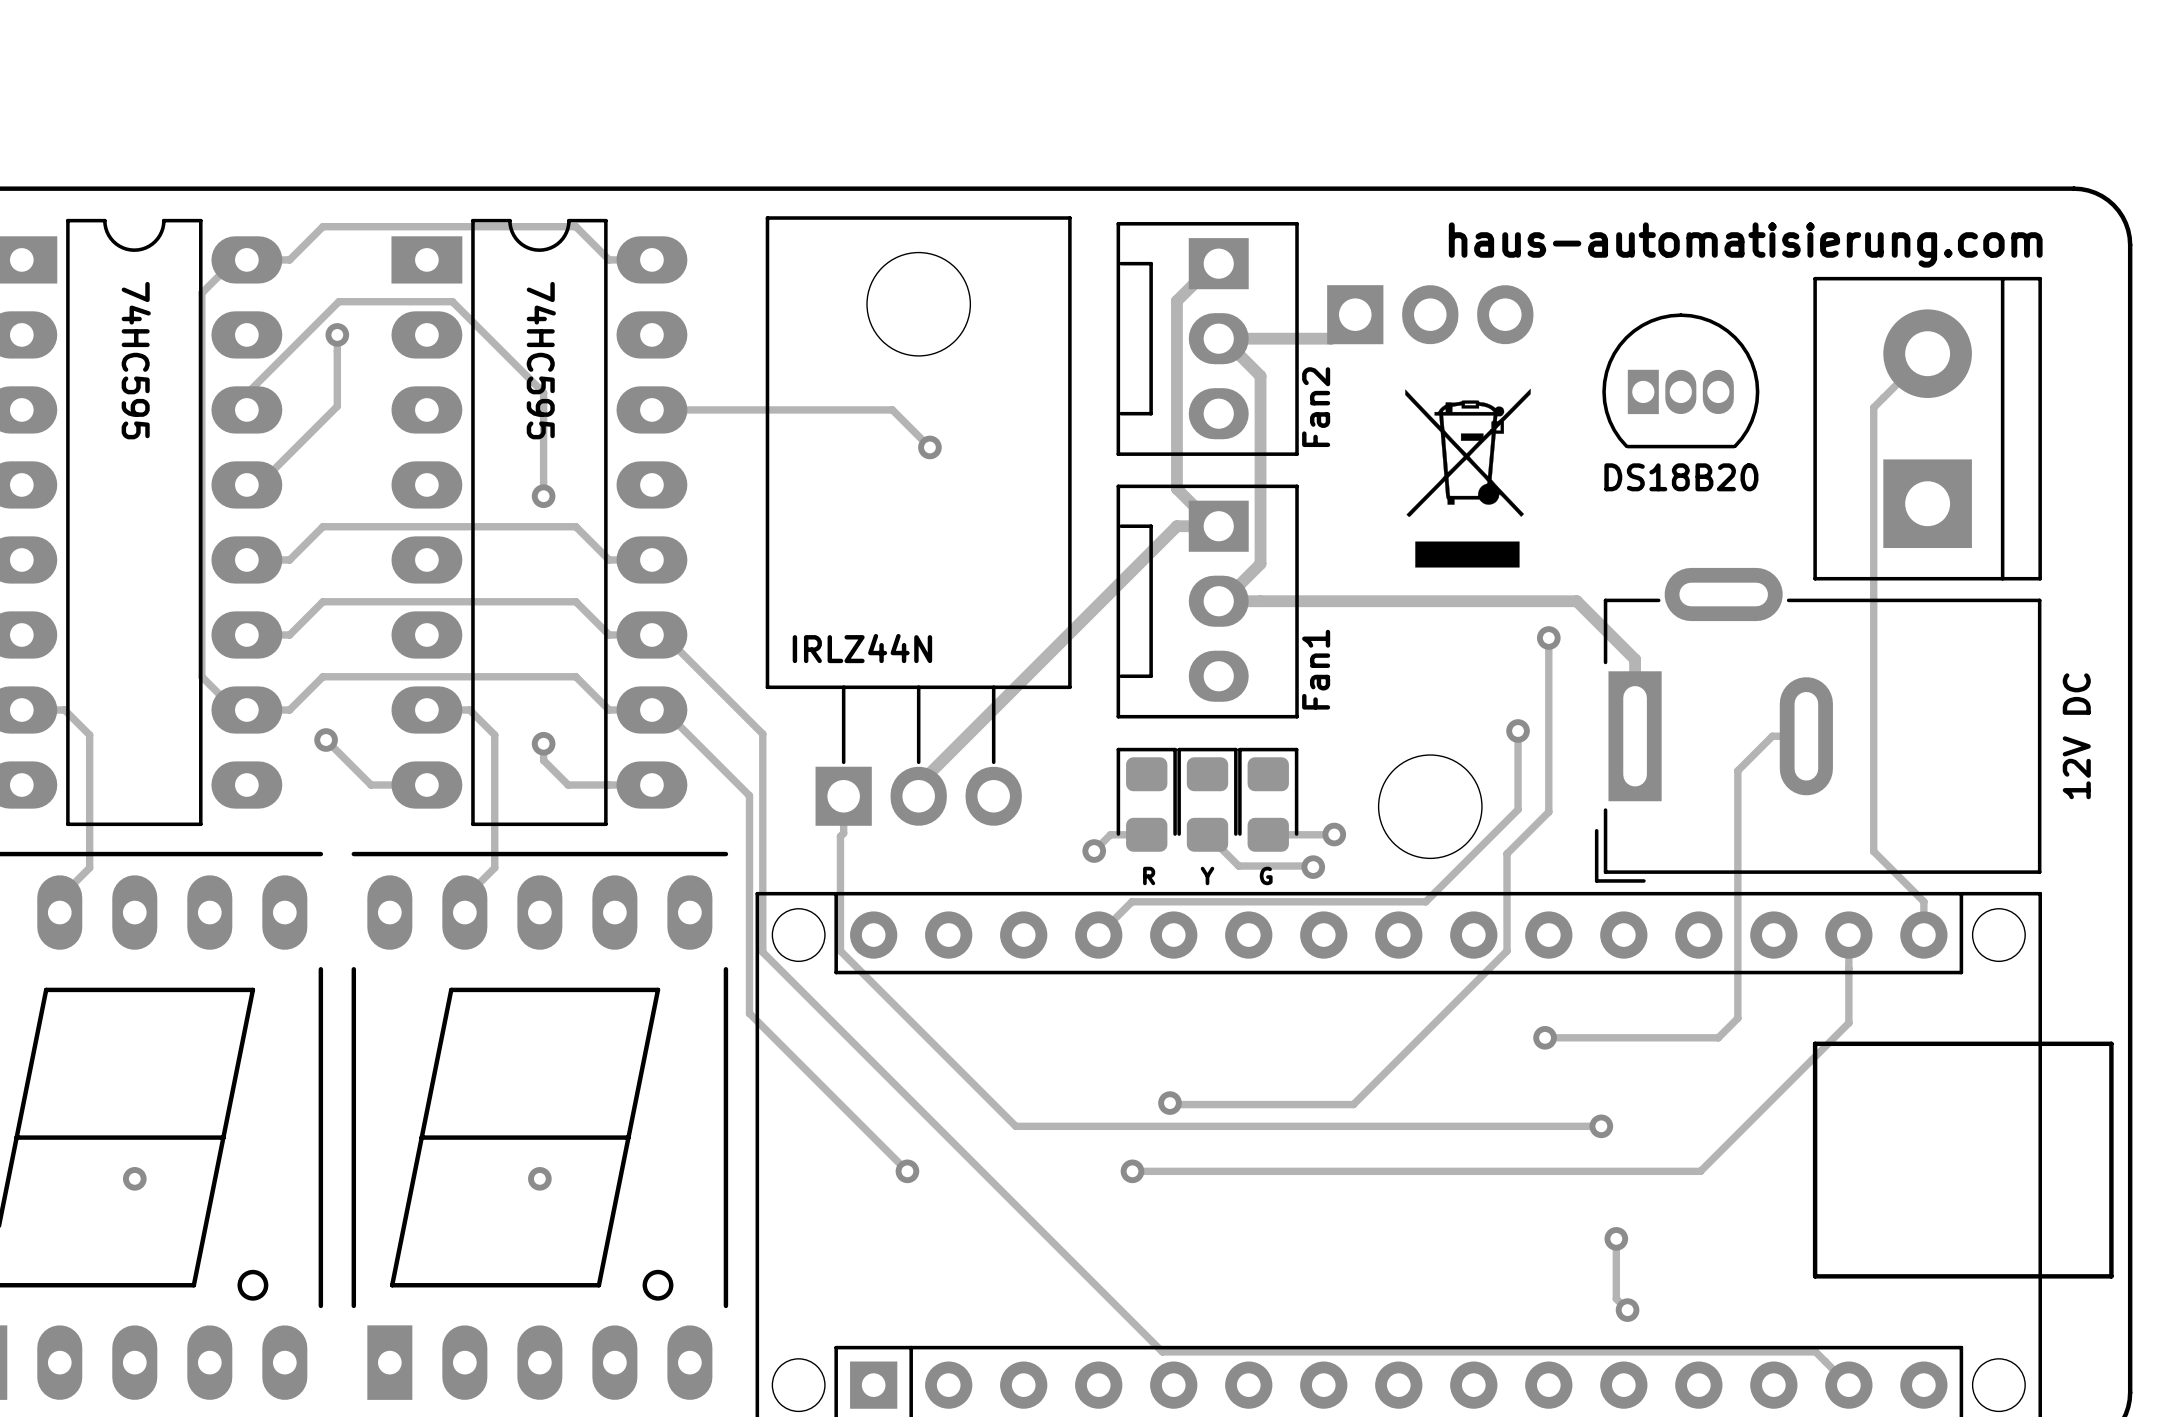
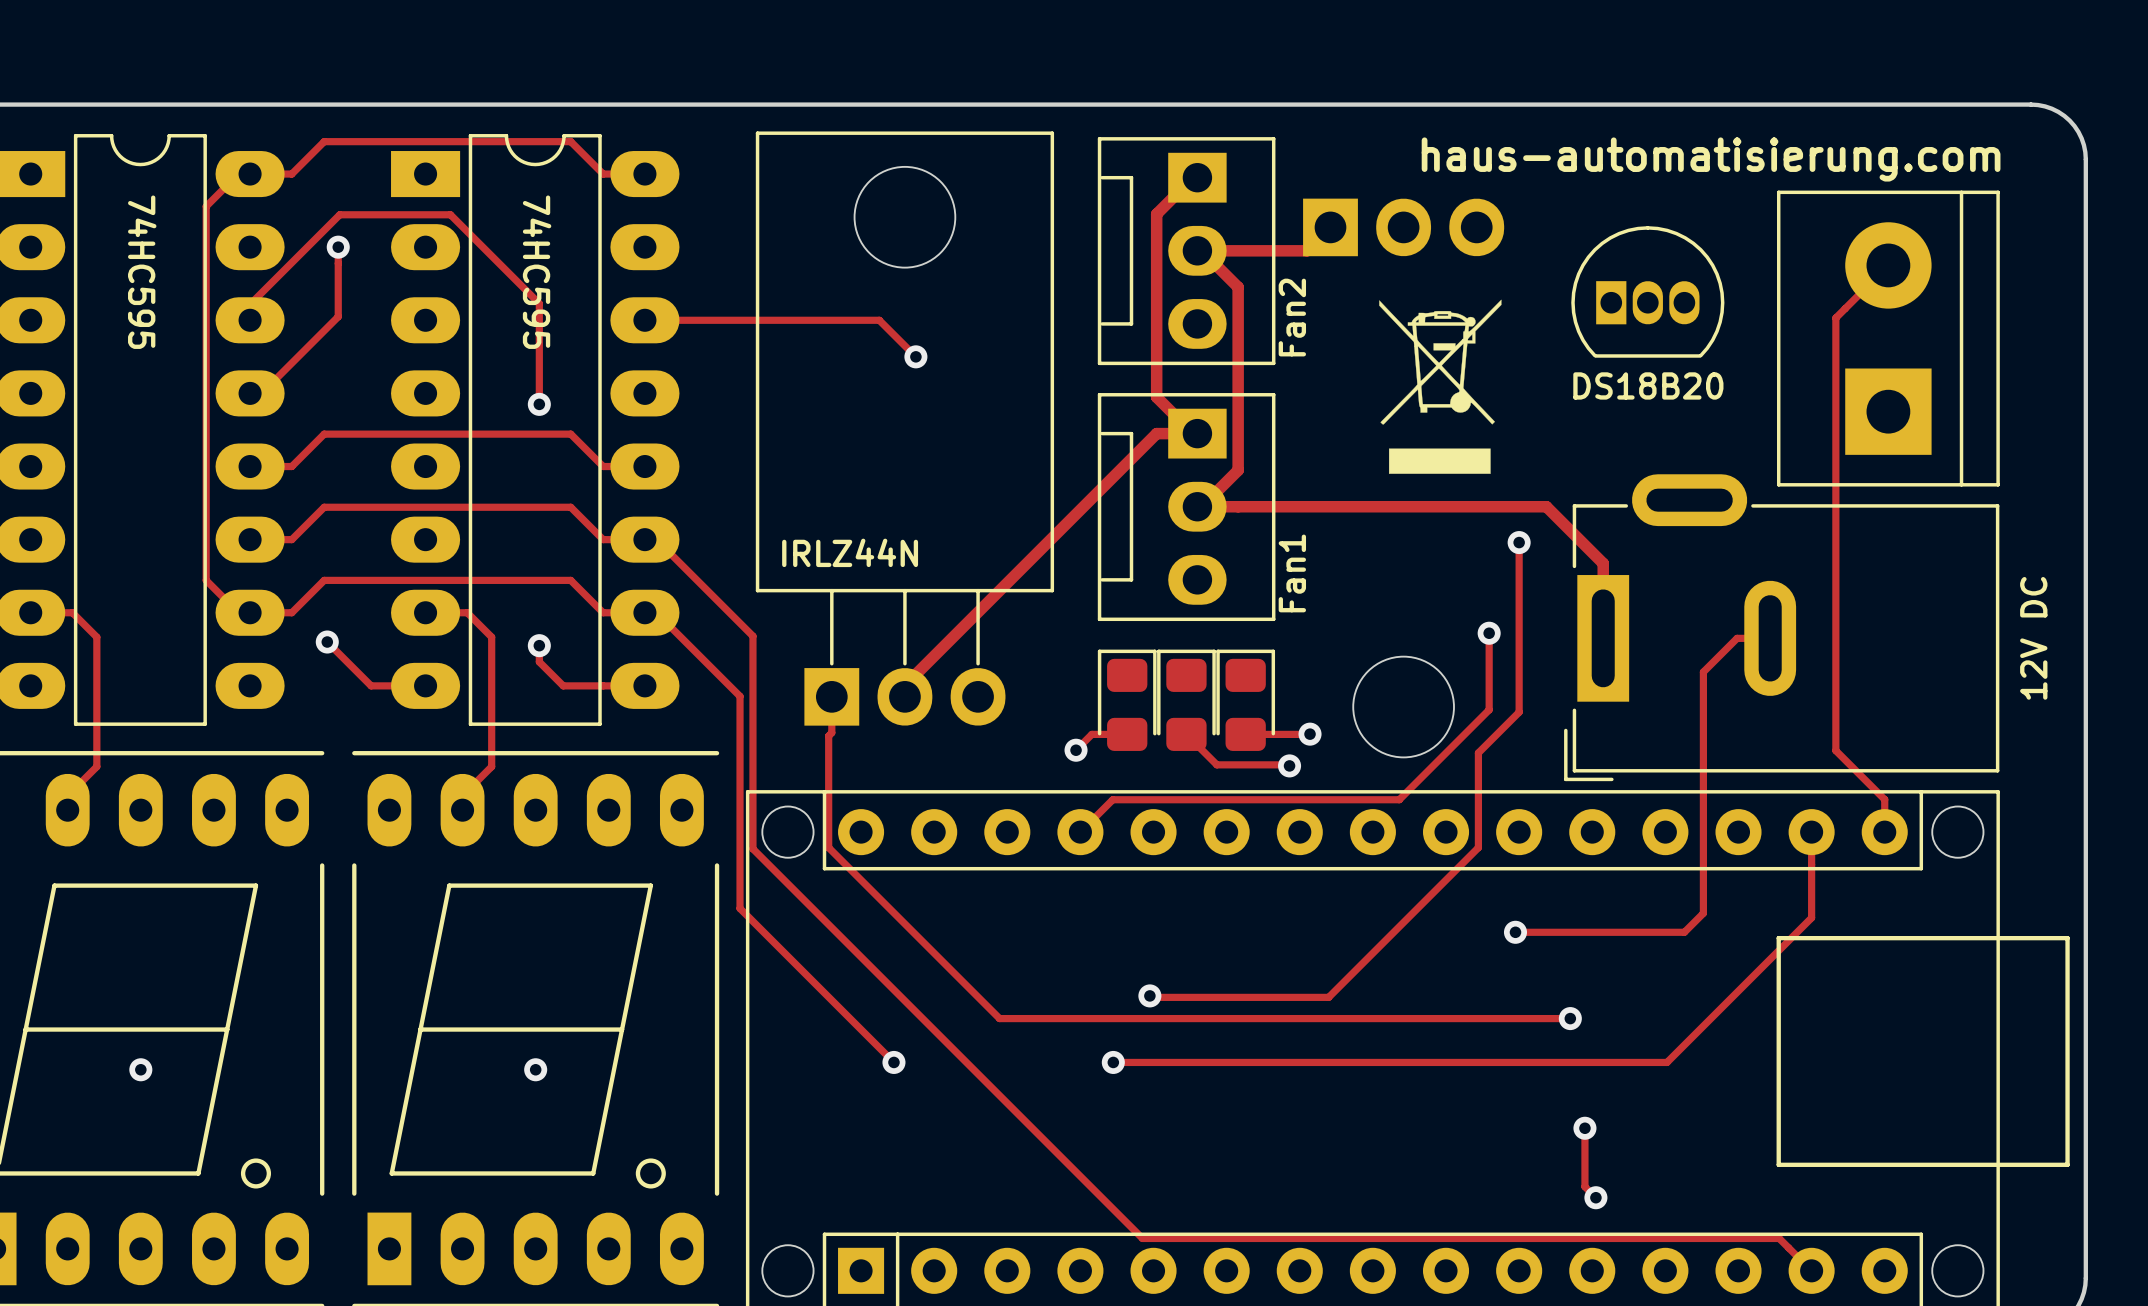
text: R Y G (1207, 875) -> none

